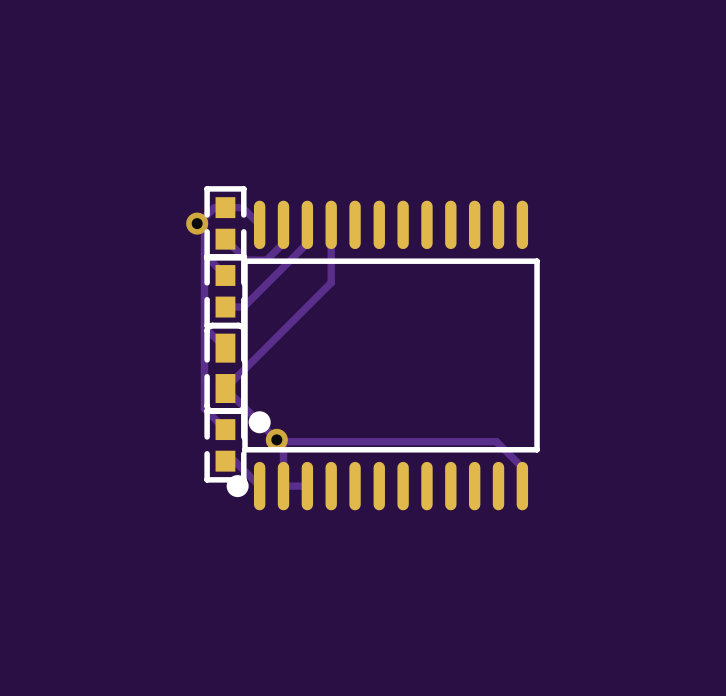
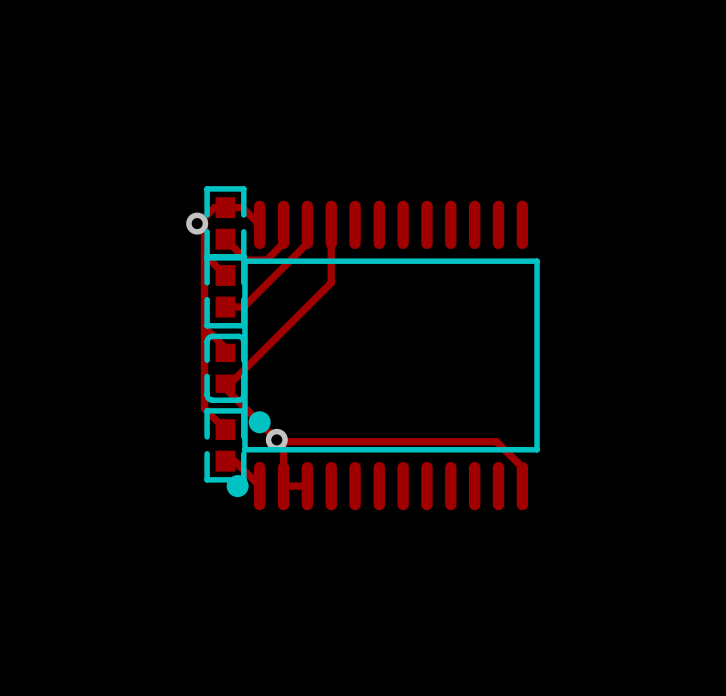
part footprint: [204, 322, 247, 415] -> [204, 333, 247, 403]

